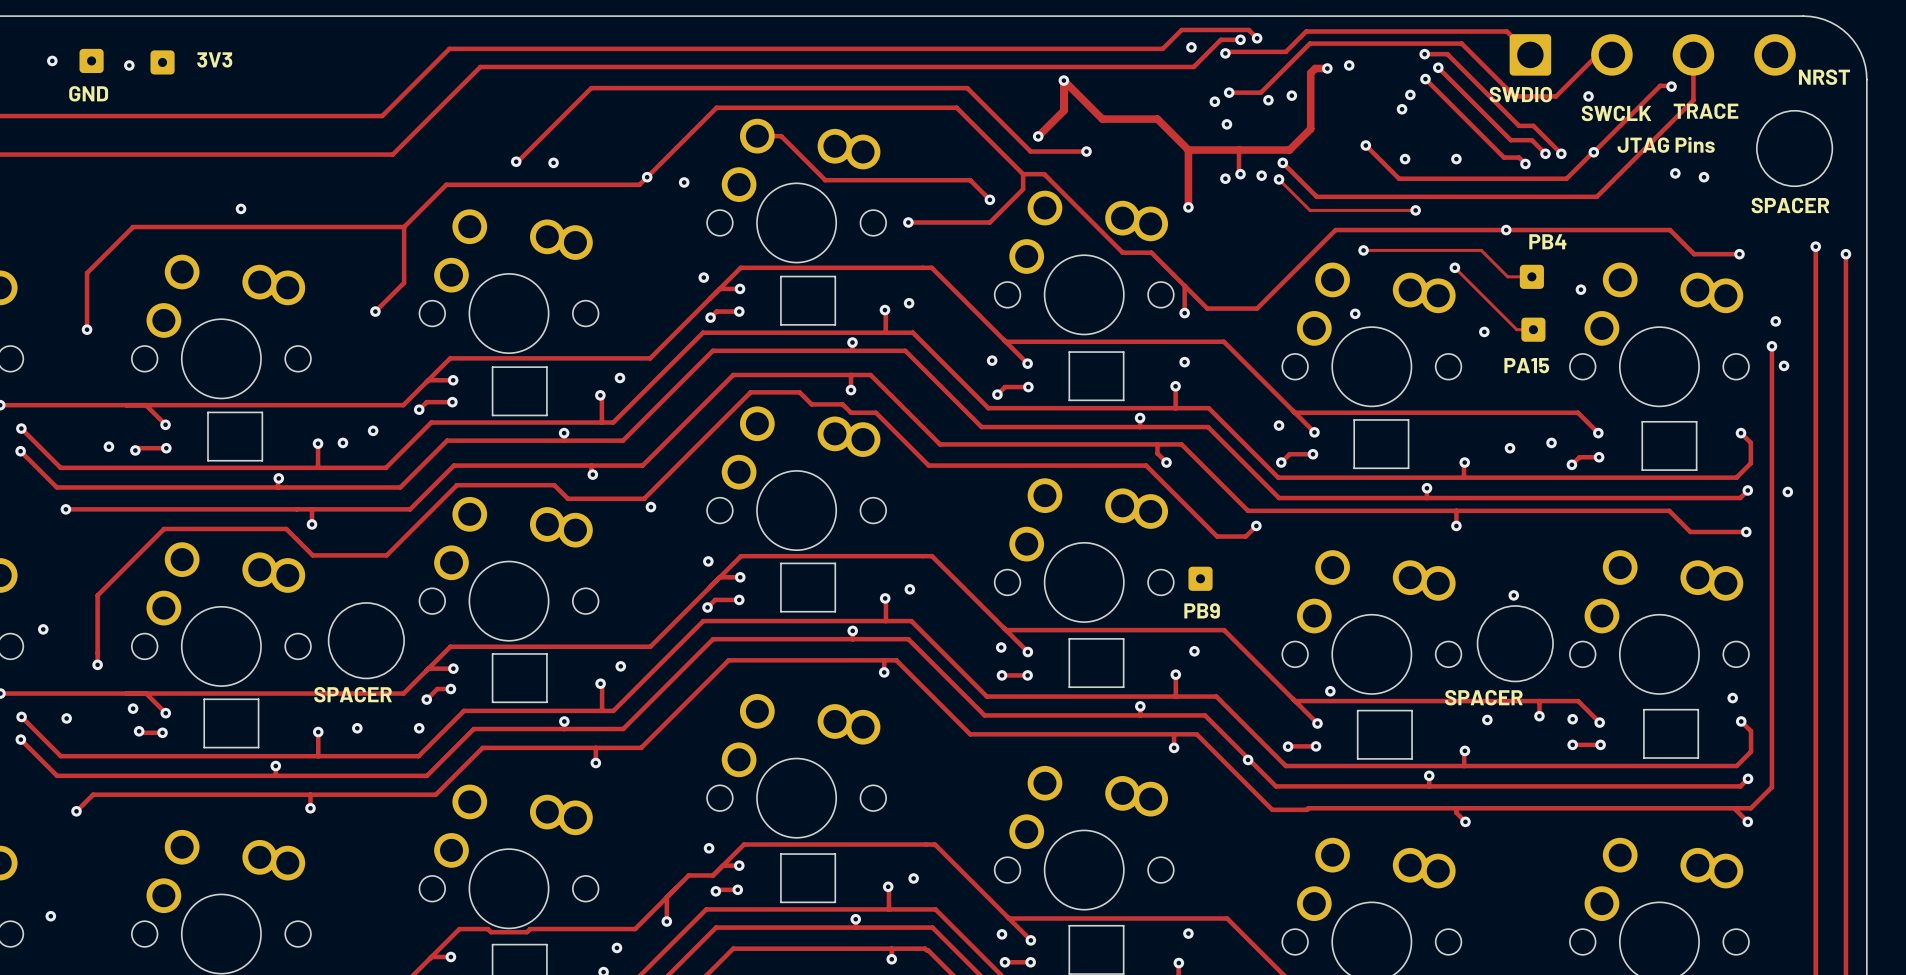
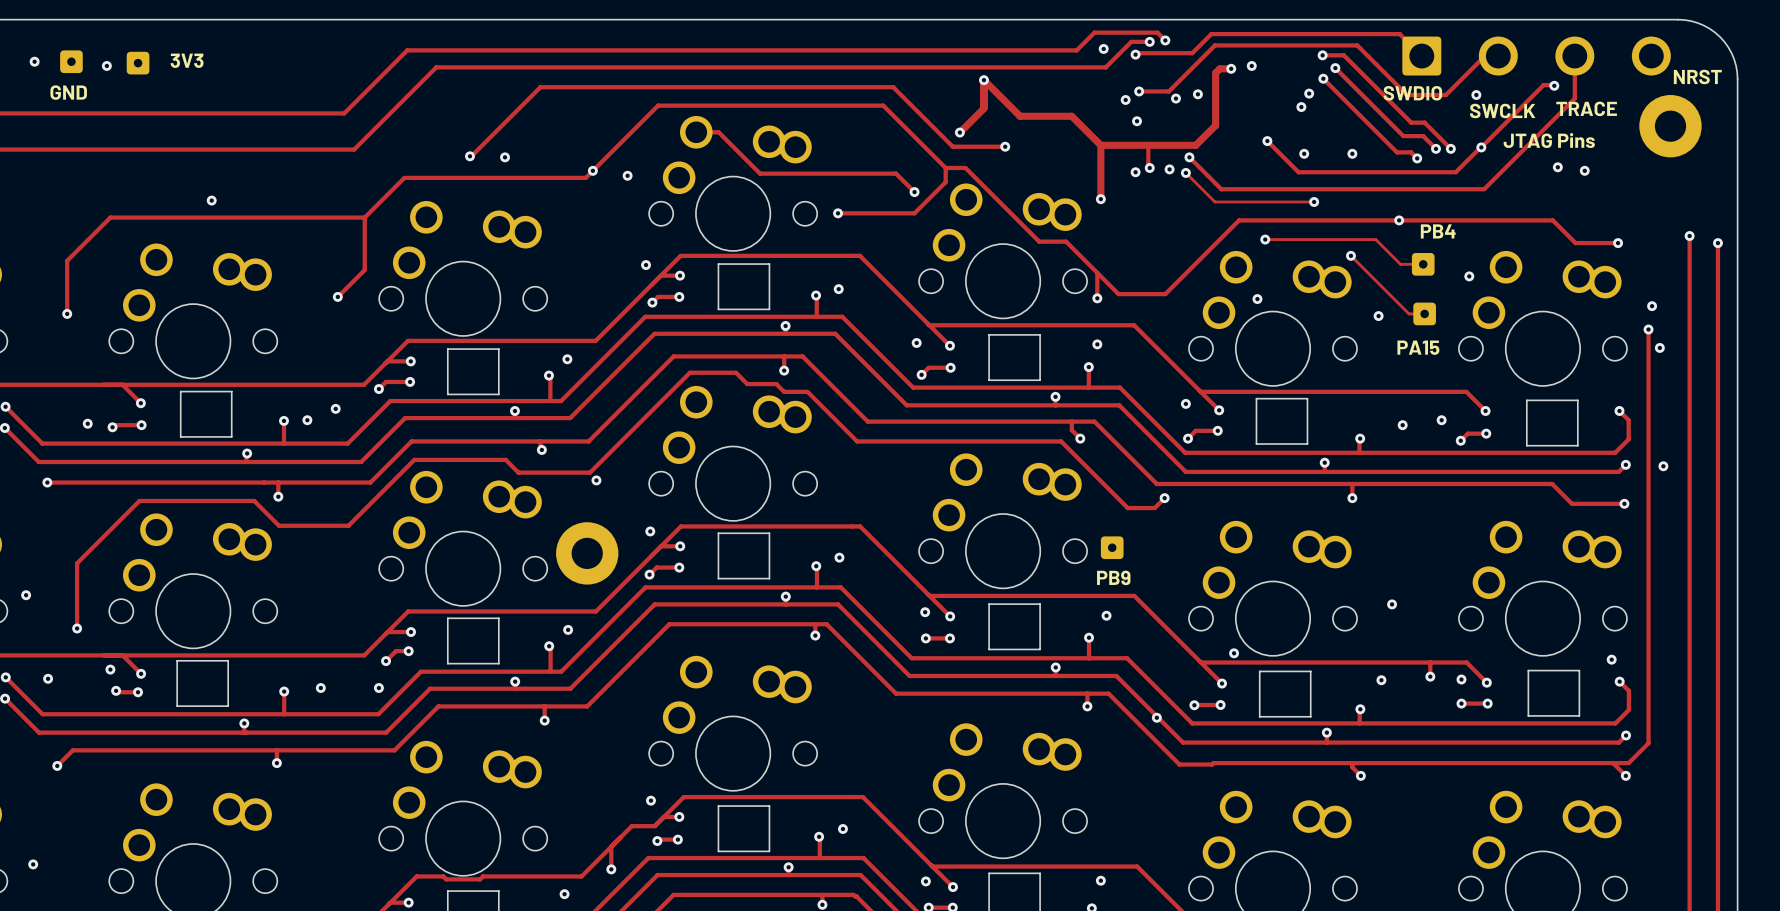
round board edge: [1756, 110, 1833, 187] -> none
part: none -> (1670, 126)
text: SPACER (1790, 205) -> none
part: none -> (587, 553)
via position: (1513, 595) -> (1392, 604)
round board edge: [328, 602, 405, 679] -> none
round board edge: [1477, 605, 1554, 682] -> none
text: SPACER (353, 694) -> none
text: SPACER (1483, 697) -> none

